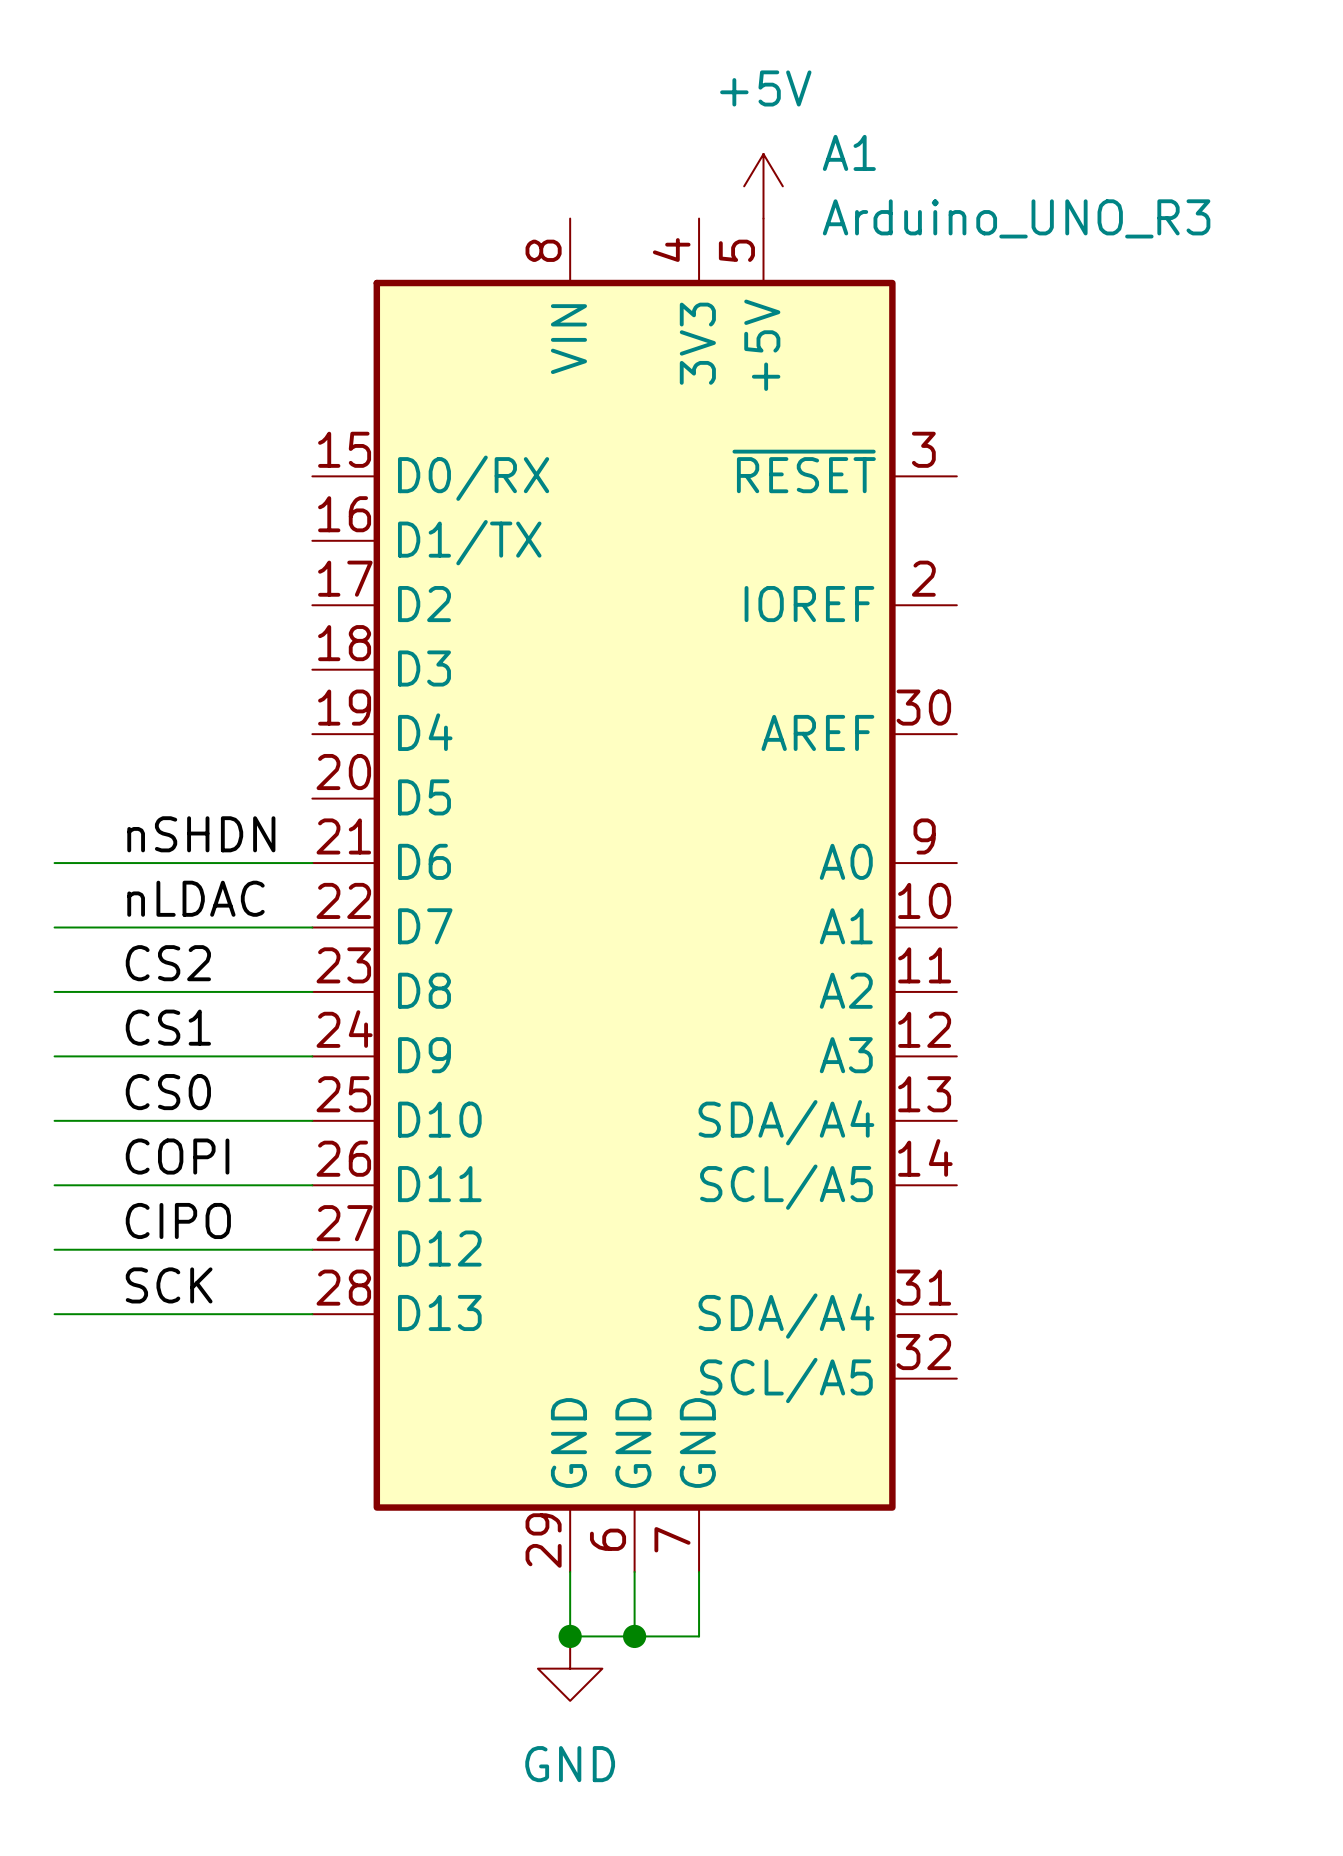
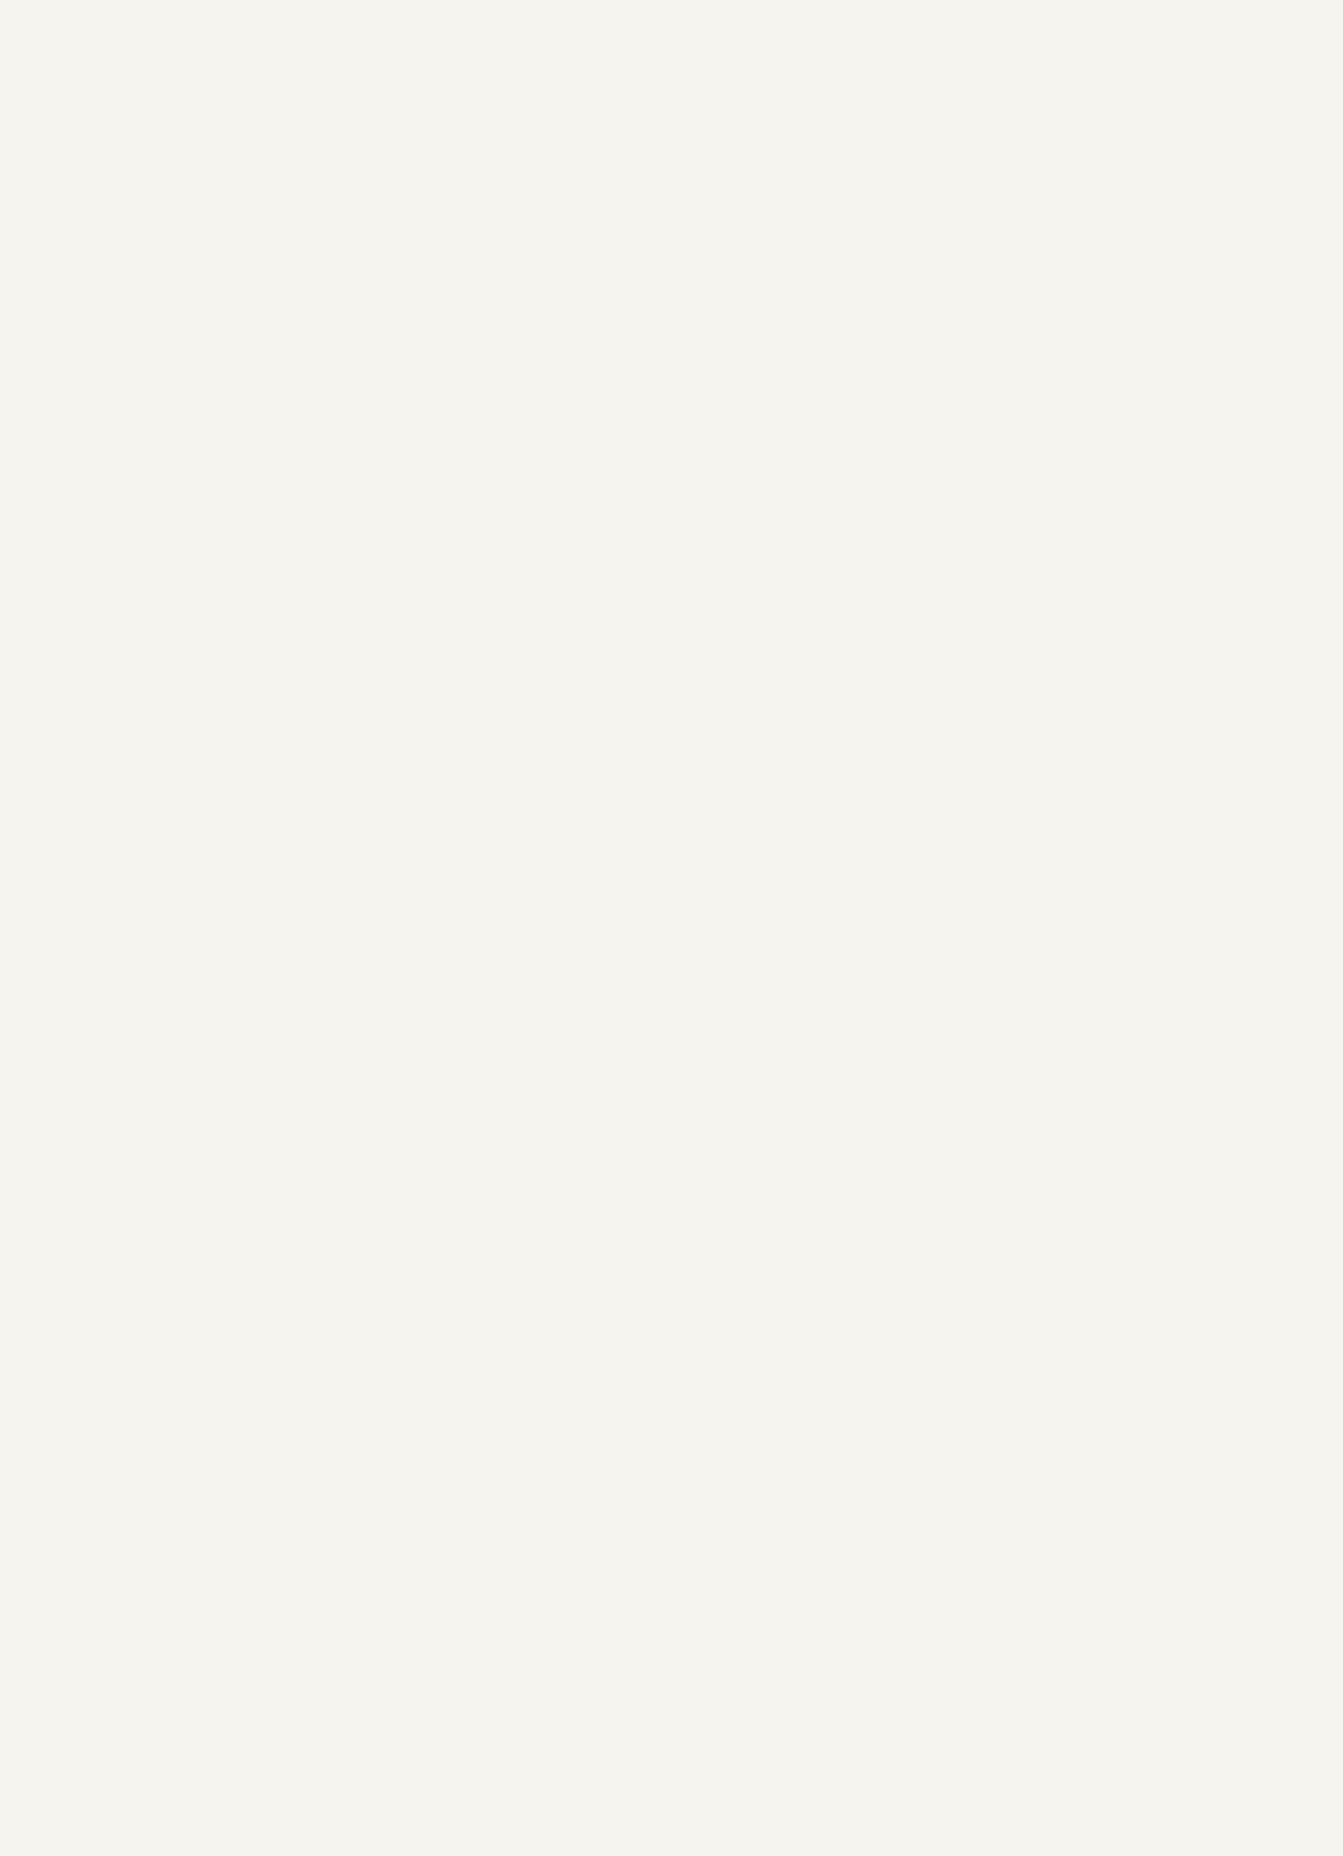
power symbol: +5V (763, 186) -> none
label: nSHDN (201, 834) -> none
wire: (54, 863) (312, 863) -> none
A1: Arduino_UNO_R3 (634, 895) -> none
label: nLDAC (195, 898) -> none
wire: (54, 927) (312, 927) -> none
label: CS2 (168, 963) -> none
wire: (54, 991) (312, 991) -> none
label: CS1 (168, 1027) -> none
wire: (54, 1056) (312, 1056) -> none
label: CS0 (168, 1092) -> none
wire: (54, 1120) (312, 1120) -> none
label: COPI (177, 1156) -> none
wire: (54, 1185) (312, 1185) -> none
label: CIPO (178, 1220) -> none
wire: (54, 1249) (312, 1249) -> none
label: SCK (169, 1285) -> none
wire: (54, 1314) (312, 1314) -> none
wire: (570, 1571) (570, 1636) (699, 1636) (699, 1571) -> none
wire: (634, 1571) (634, 1636) -> none
junction: (570, 1636) -> none
junction: (634, 1636) -> none
power symbol: GND (570, 1668) -> none

